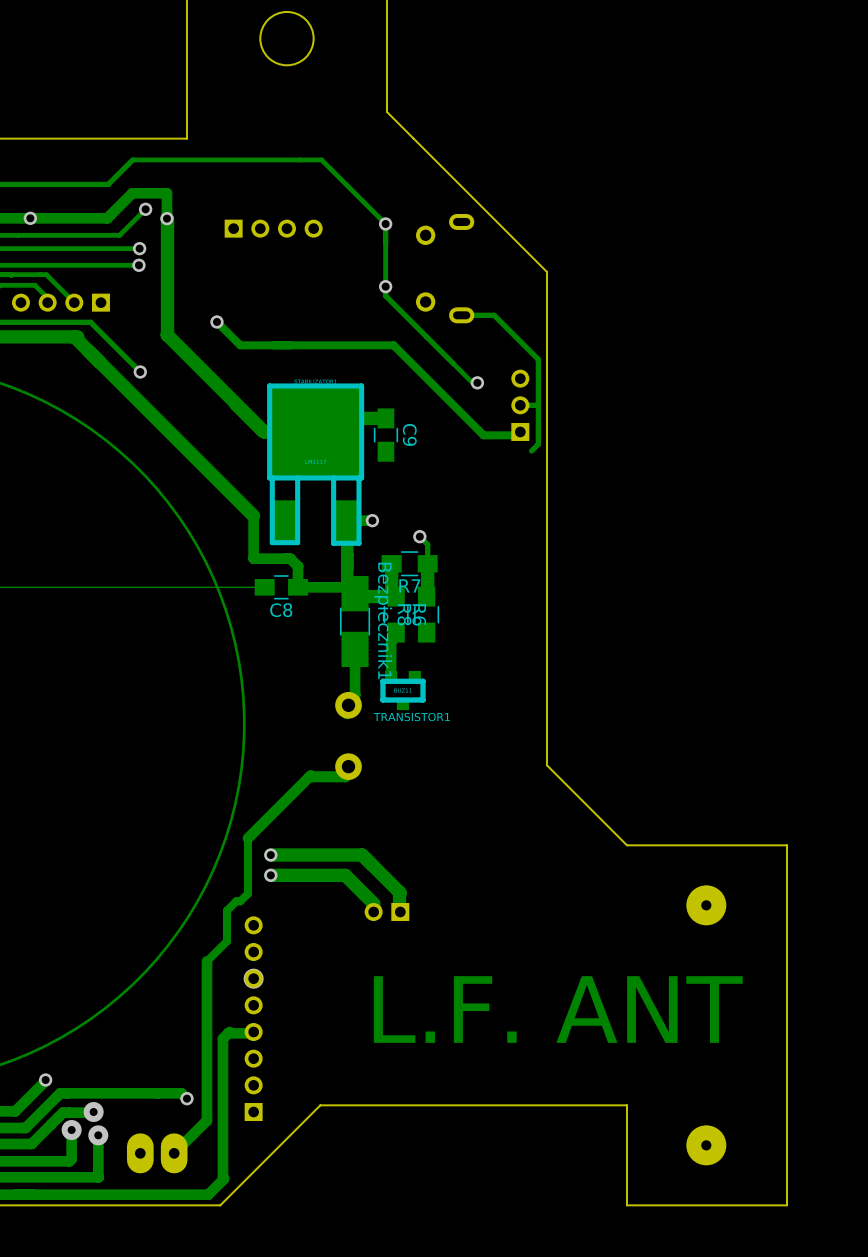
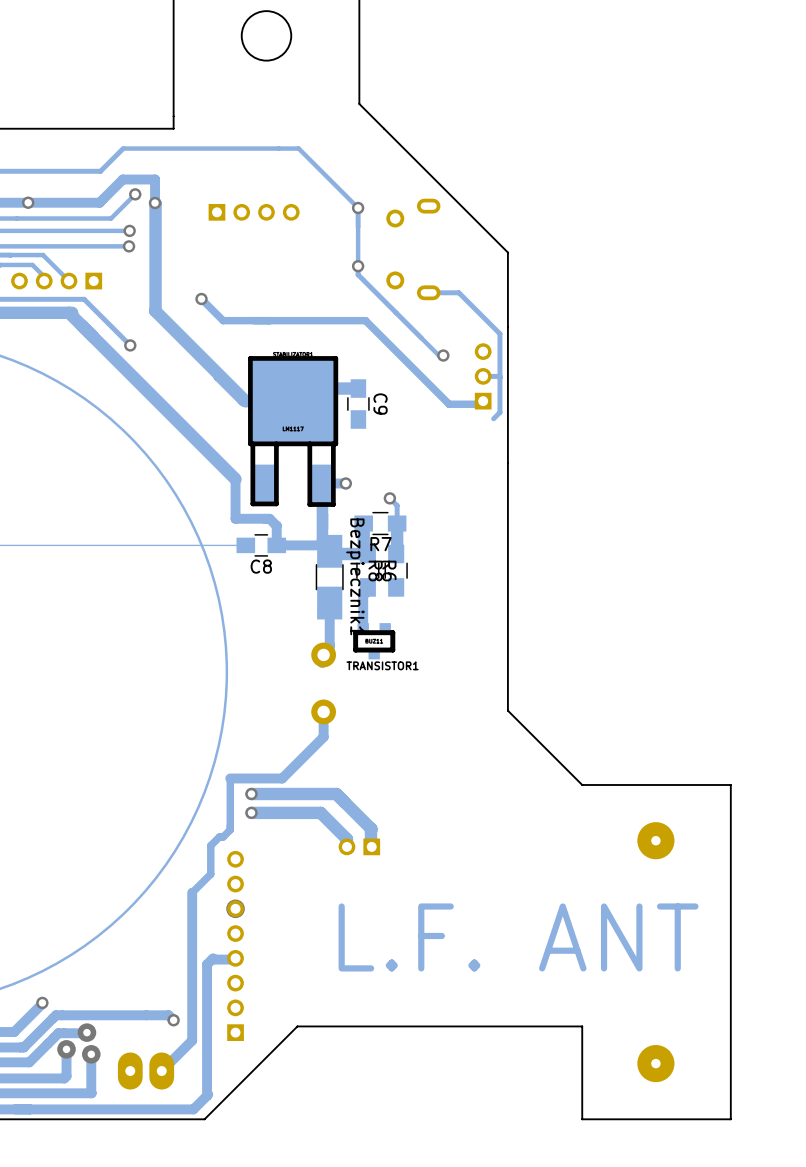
track: (309, 776) (345, 776) (346, 775) (310, 775) (247, 838) -> (323, 711) (323, 737) (282, 778) (230, 778)

